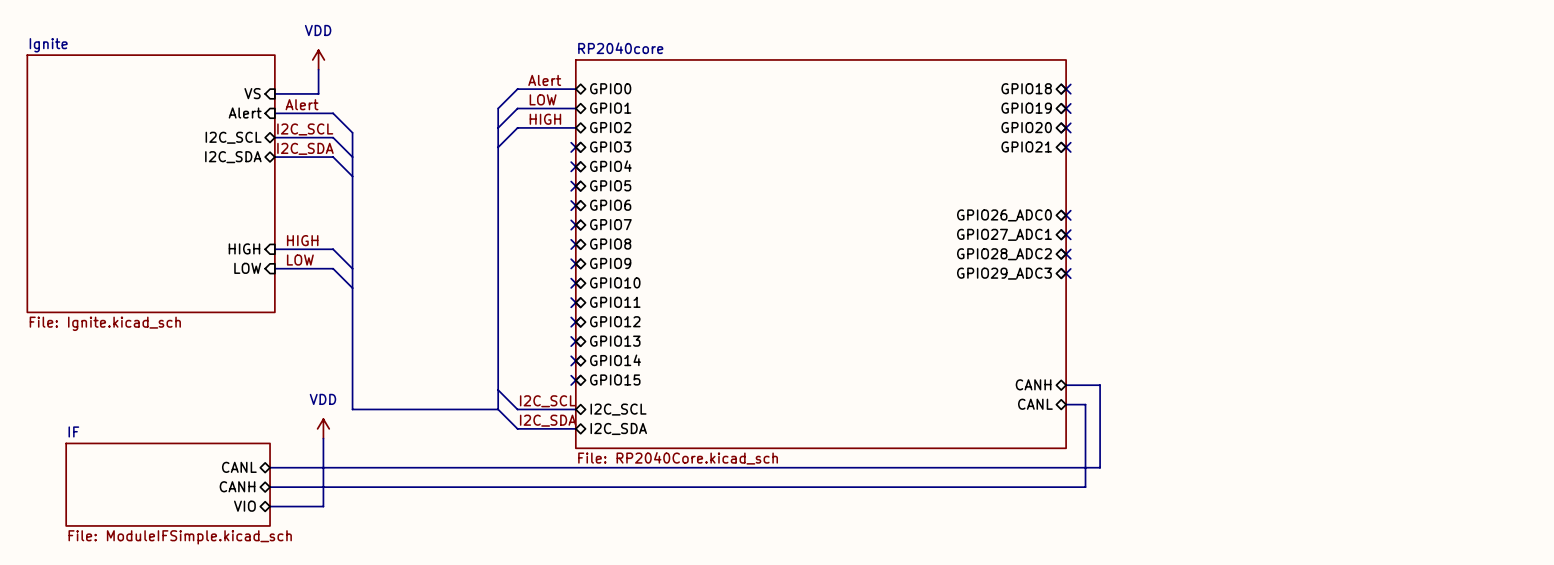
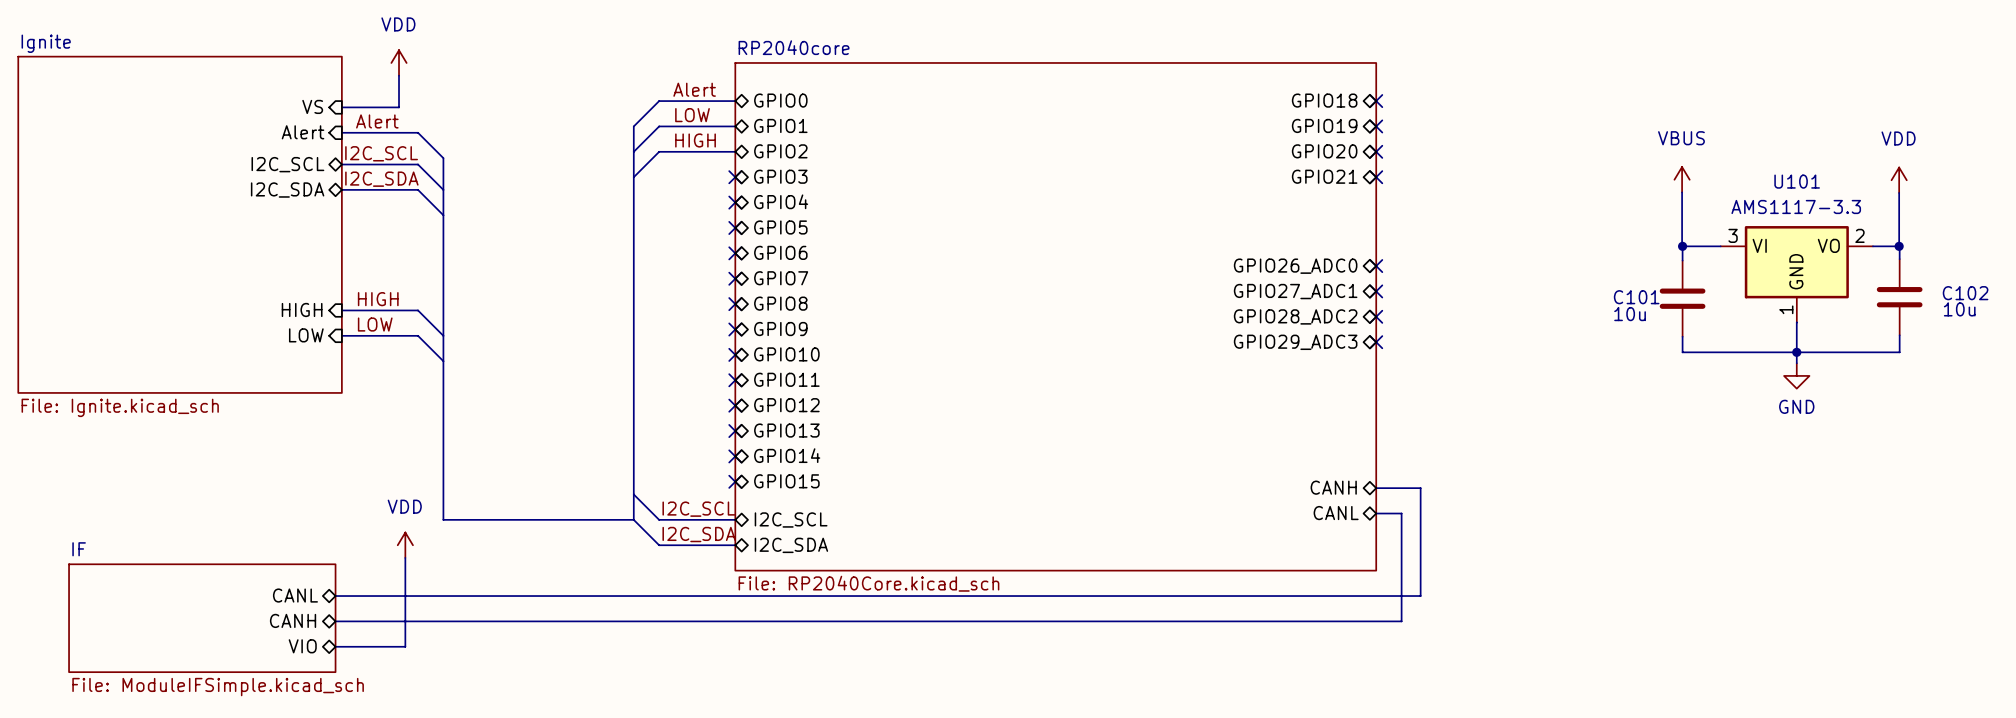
power symbol: none -> VBUS (1682, 179)
power symbol: none -> VDD (1899, 180)
wire: none -> (1682, 192) (1682, 246) (1720, 246)
wire: none -> (1899, 192) (1899, 246)
wire: none -> (1682, 246) (1682, 260)
junction: none -> (1682, 246)
wire: none -> (1872, 246) (1899, 246) (1899, 259)
junction: none -> (1899, 246)
U101: none -> AMS1117-3.3 (1796, 274)
C102: none -> 10u (1899, 297)
C101: none -> 10u (1682, 298)
wire: none -> (1796, 322) (1796, 363)
wire: none -> (1899, 335) (1899, 352) (1682, 352) (1682, 336)
junction: none -> (1796, 352)
power symbol: none -> GND (1796, 375)

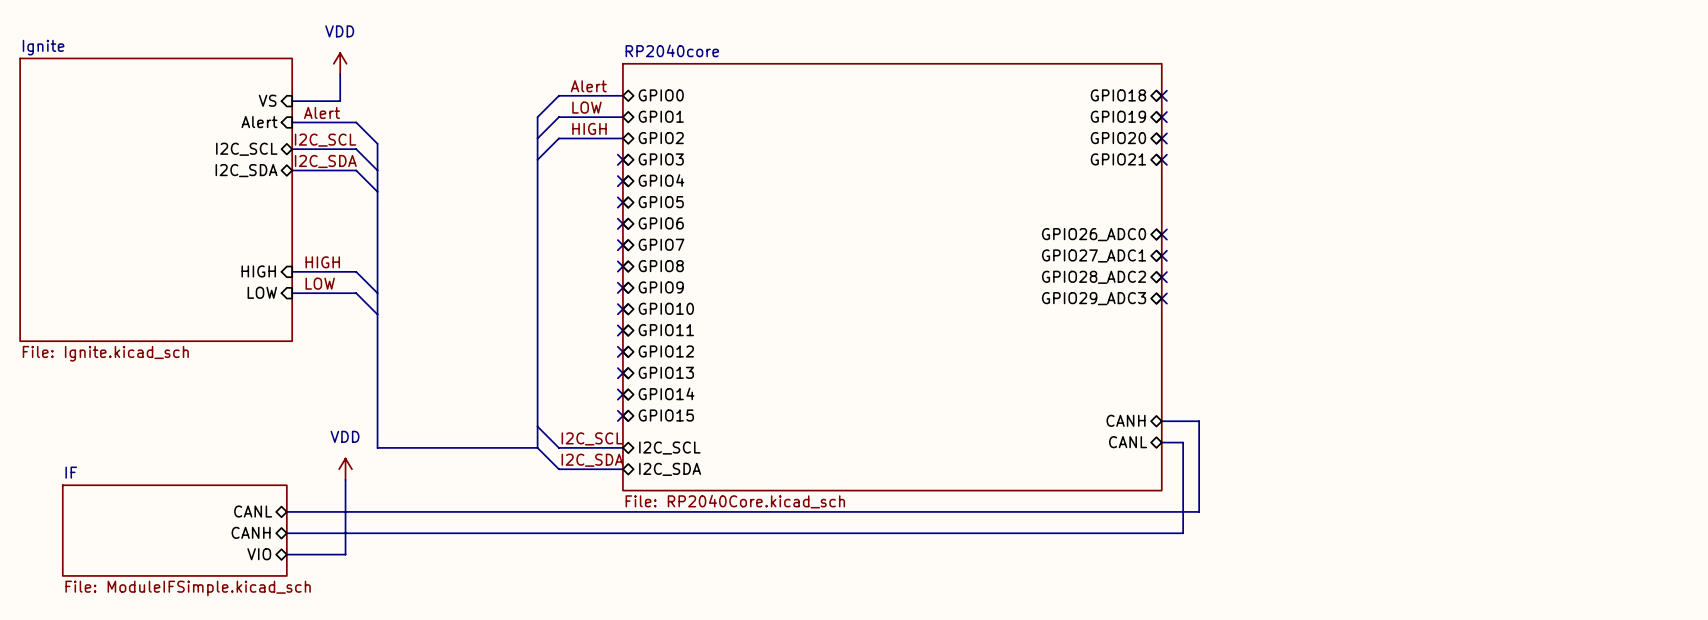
power symbol: VBUS (1682, 179) -> none
power symbol: VDD (1899, 180) -> none
wire: (1682, 192) (1682, 246) (1720, 246) -> none
wire: (1899, 192) (1899, 246) -> none
wire: (1682, 246) (1682, 260) -> none
junction: (1682, 246) -> none
wire: (1872, 246) (1899, 246) (1899, 259) -> none
junction: (1899, 246) -> none
U101: AMS1117-3.3 (1796, 274) -> none
C102: 10u (1899, 297) -> none
C101: 10u (1682, 298) -> none
wire: (1796, 322) (1796, 363) -> none
wire: (1899, 335) (1899, 352) (1682, 352) (1682, 336) -> none
junction: (1796, 352) -> none
power symbol: GND (1796, 375) -> none

